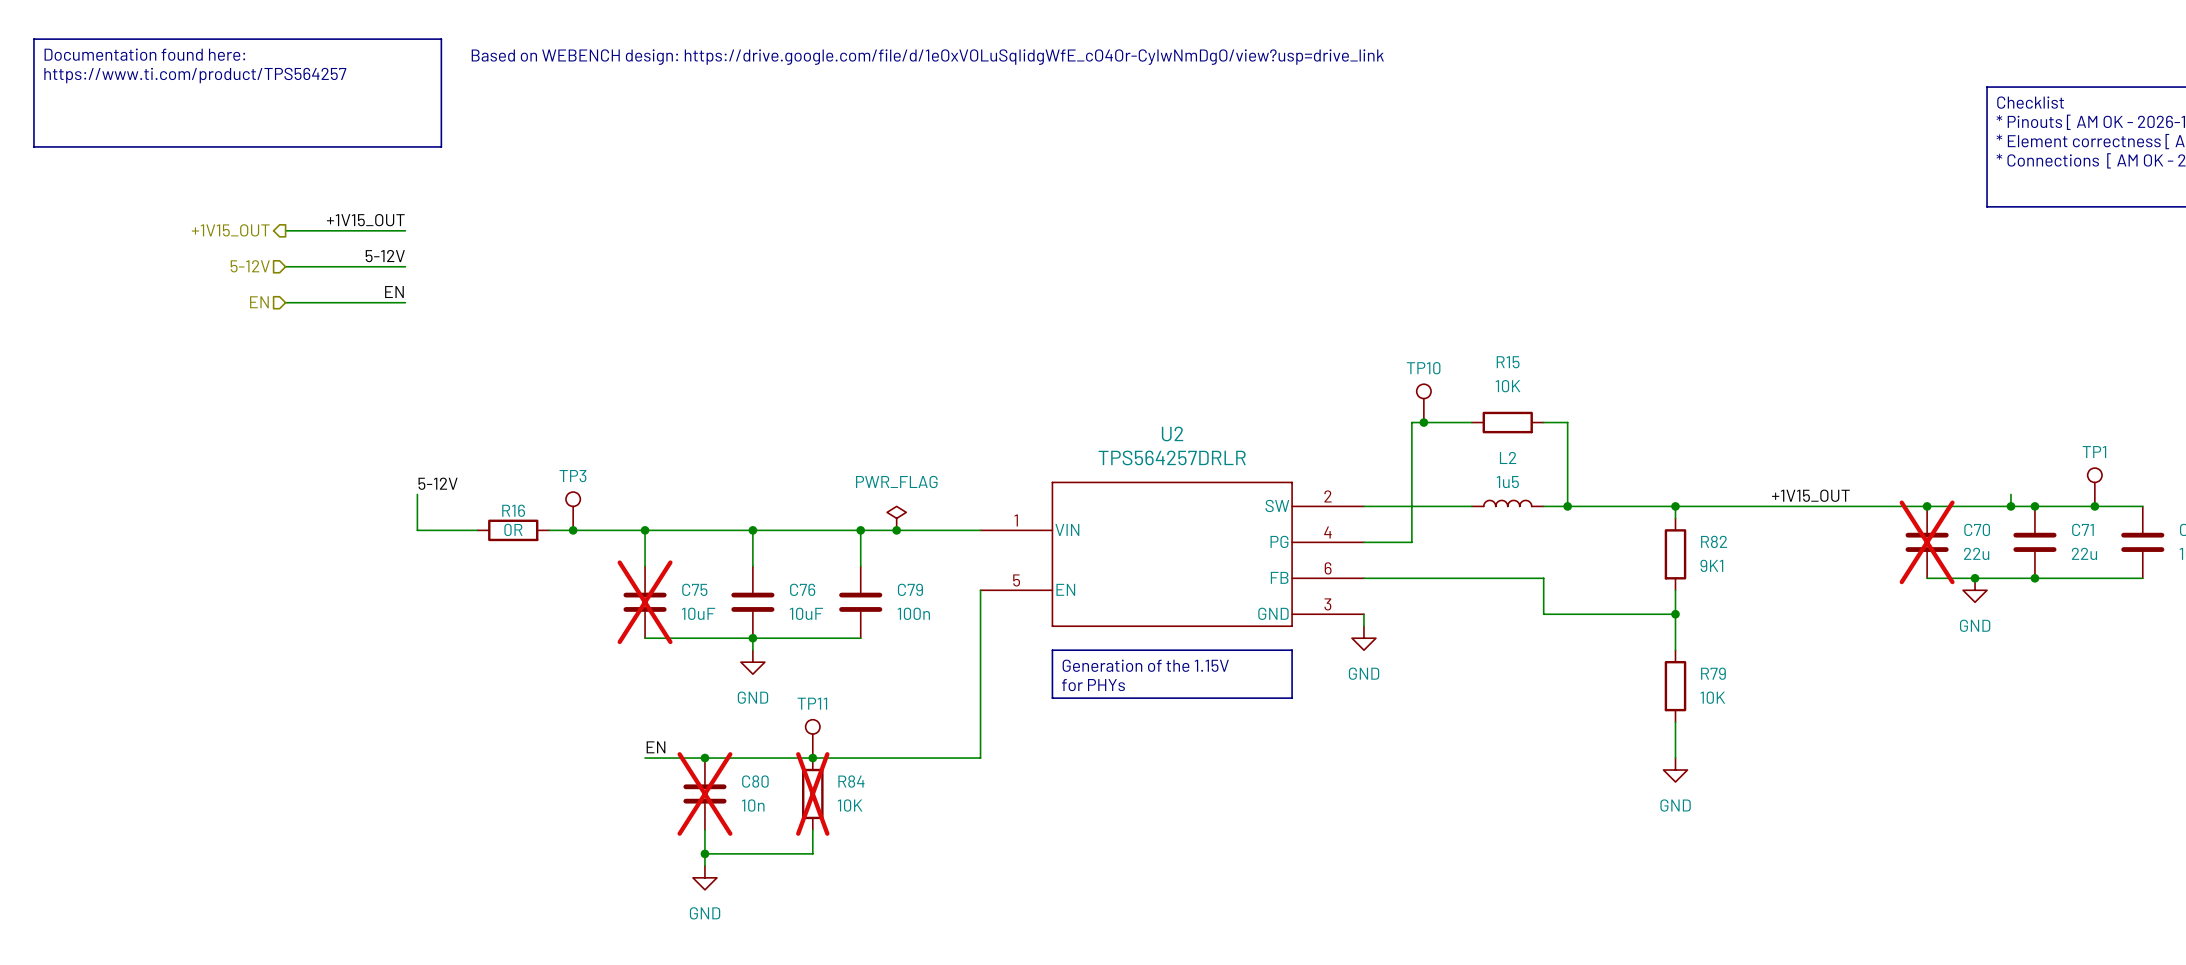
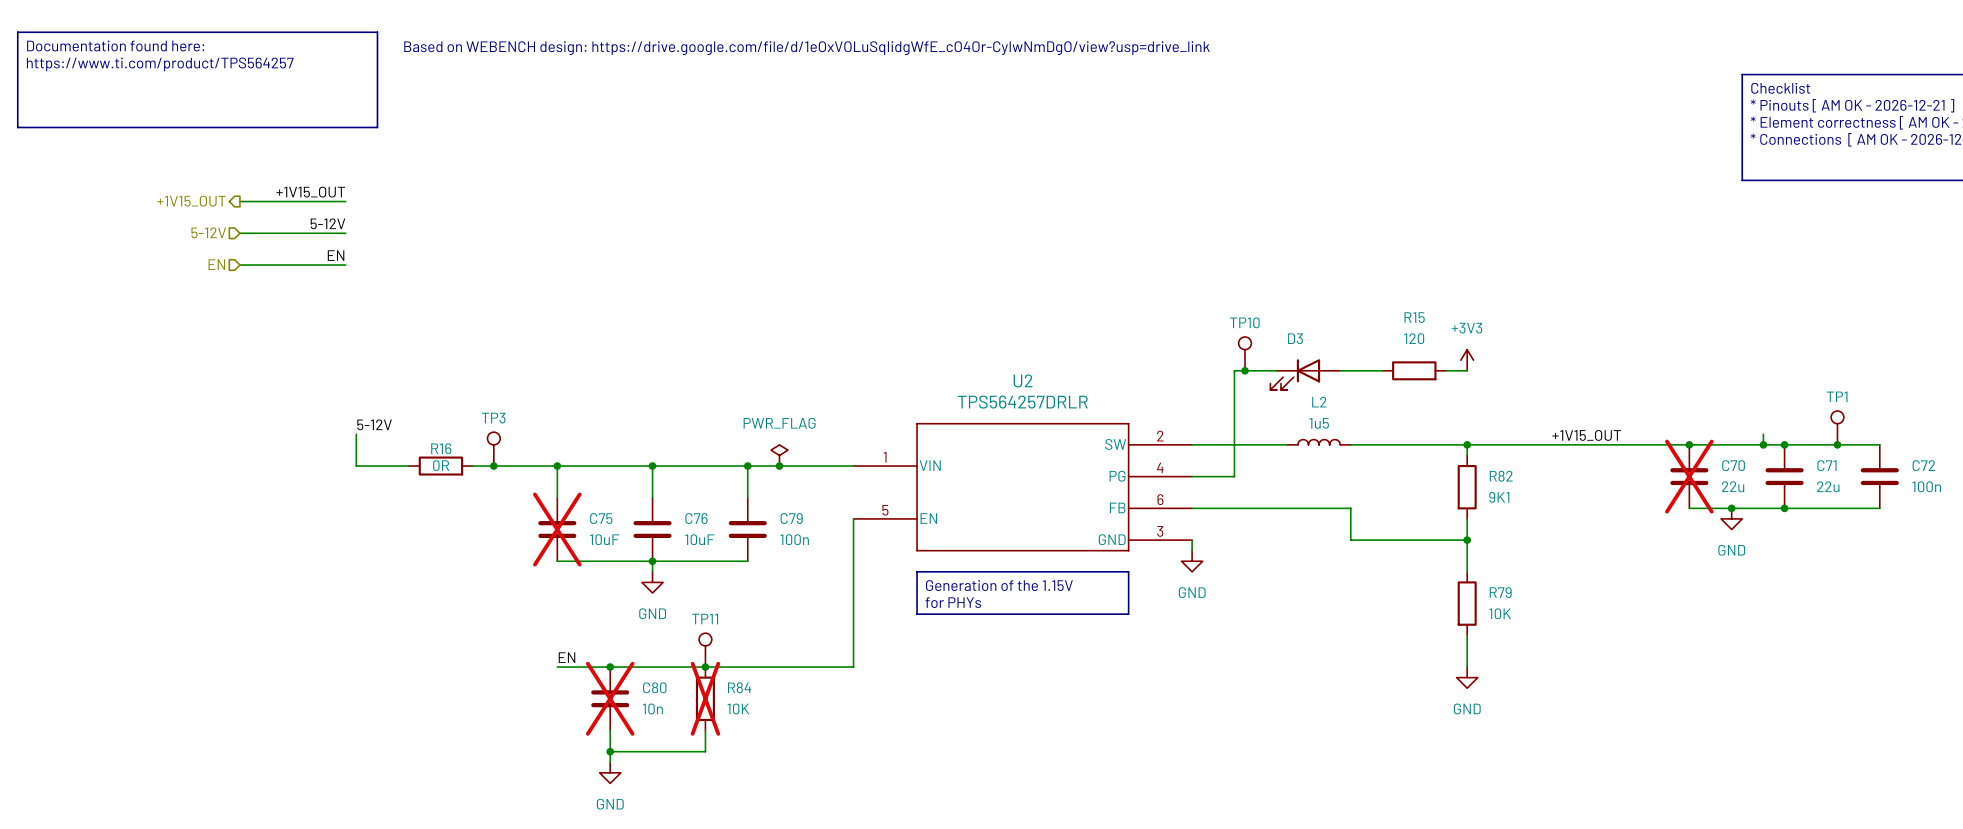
R15 value: 10K (1508, 386) -> 120 (1414, 338)
power symbol: none -> +3V3 (1467, 360)
R15 position: (1507, 422) -> (1414, 370)
wire: (1567, 422) (1567, 506) -> (1371, 370) (1382, 370)
wire: none -> (1446, 370) (1467, 370)
D3: none -> (1305, 374)
junction: (1567, 506) -> none

